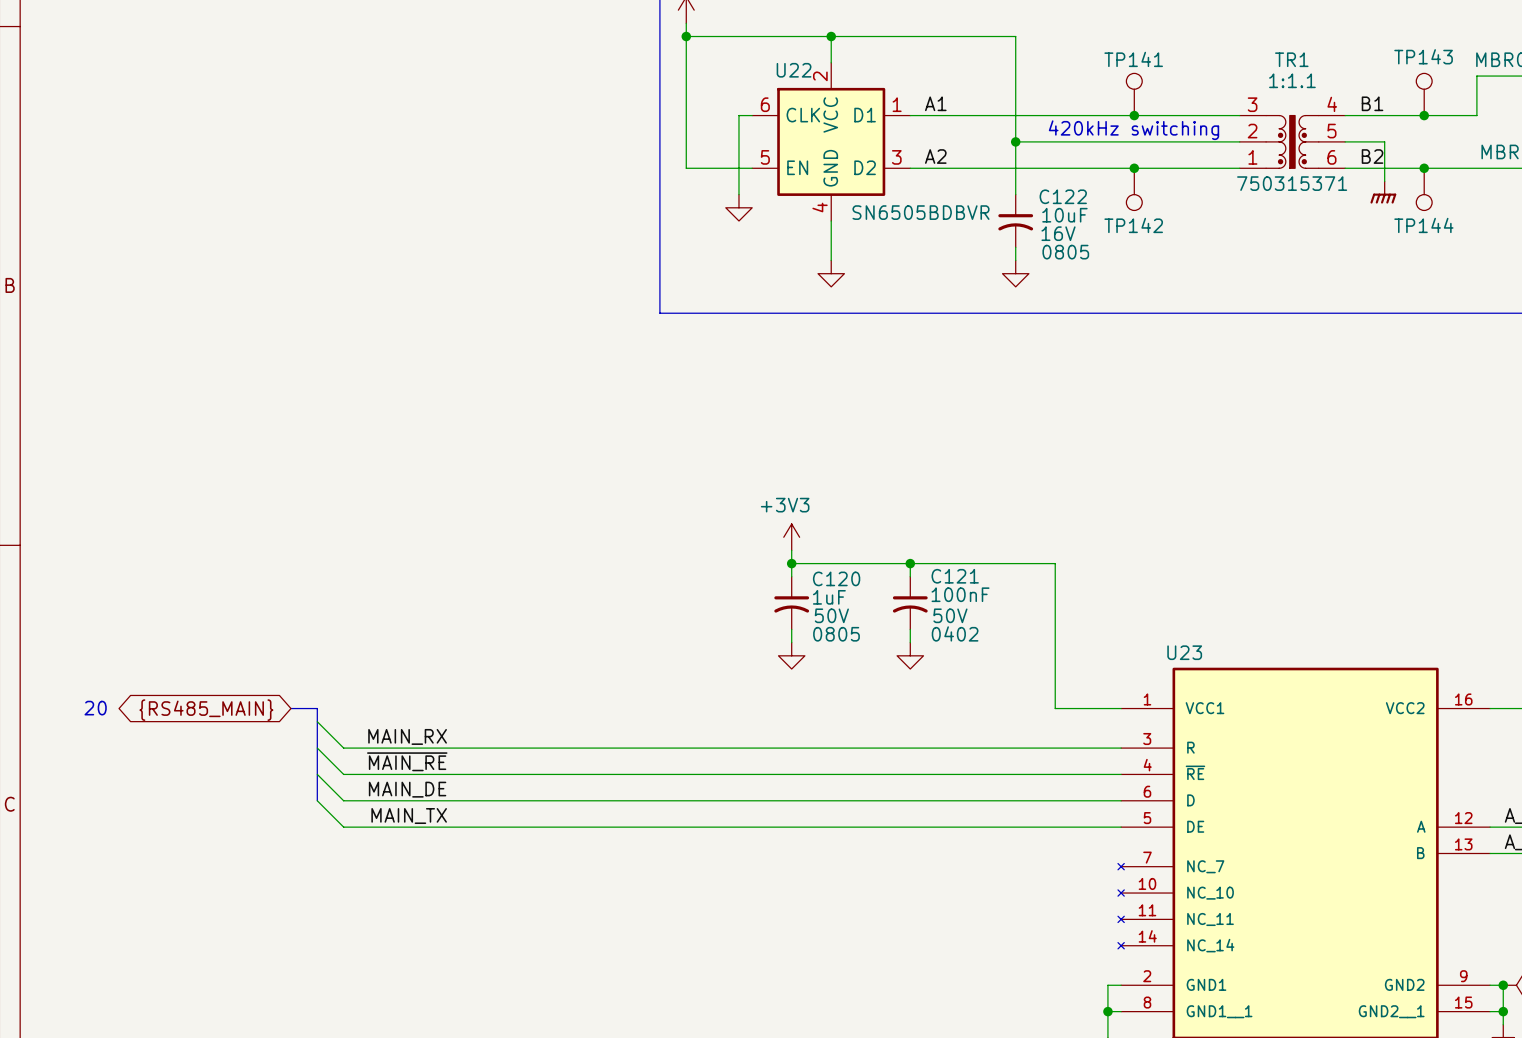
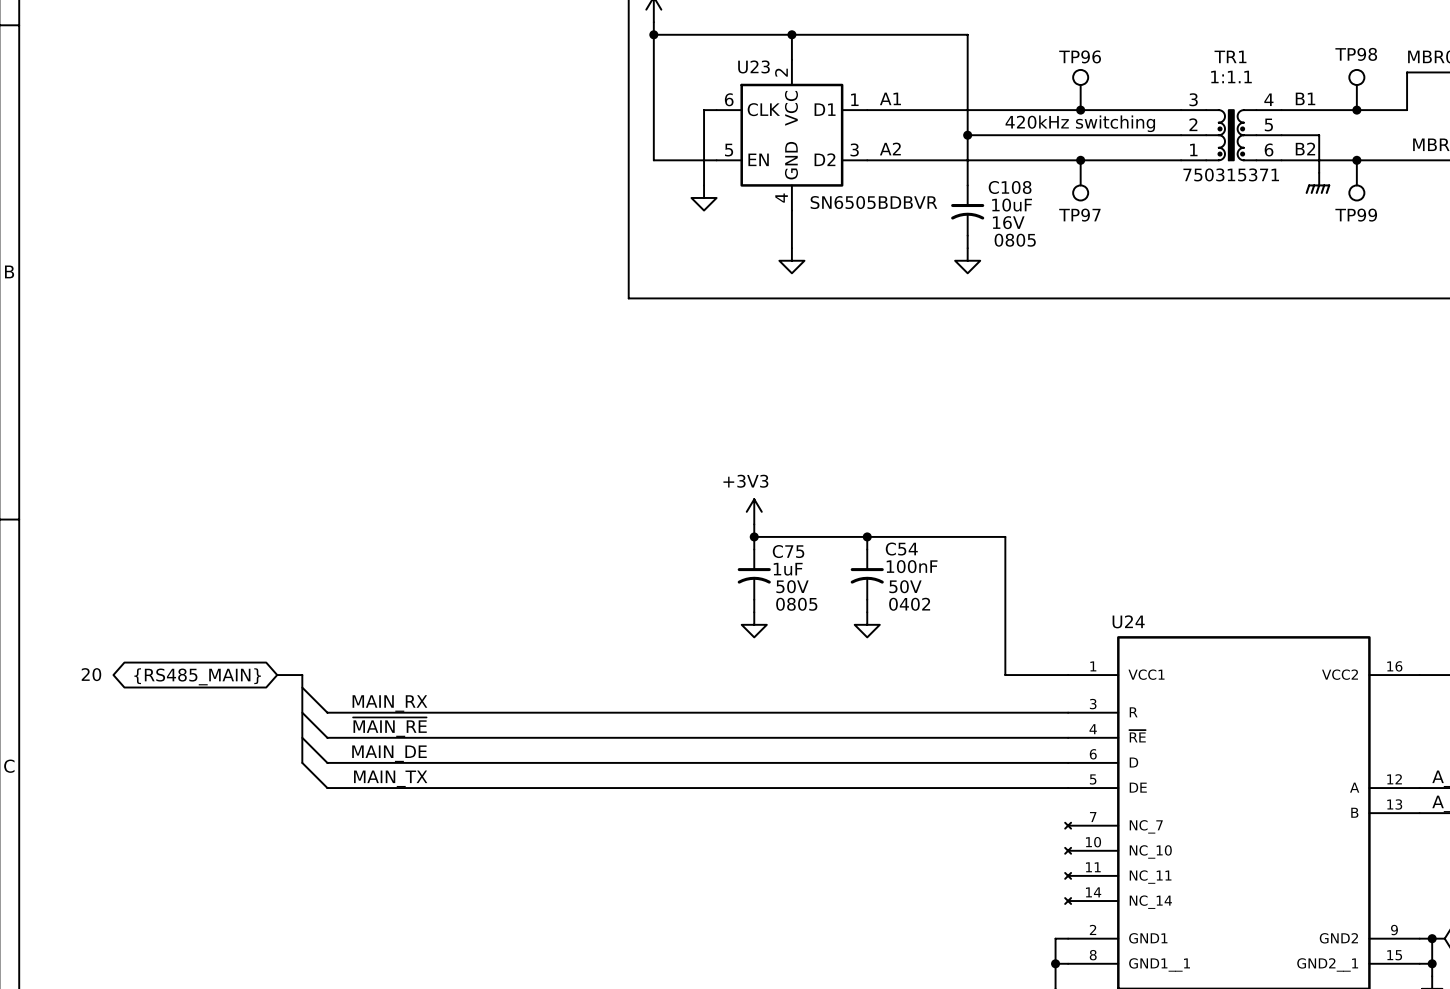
TP143 name: TP143 (1423, 56) -> TP98 (1356, 54)
TP141 name: TP141 (1133, 59) -> TP96 (1080, 56)
U22 name: U22 (794, 70) -> U23 (754, 66)
C122 name: C122 (1063, 196) -> C108 (1010, 187)
TP142 name: TP142 (1133, 225) -> TP97 (1079, 215)
TP144 name: TP144 (1423, 225) -> TP99 (1356, 215)
C121 name: C121 (955, 576) -> C54 (901, 549)
C120 name: C120 (836, 578) -> C75 (788, 551)
U23 name: U23 (1184, 652) -> U24 (1128, 621)

